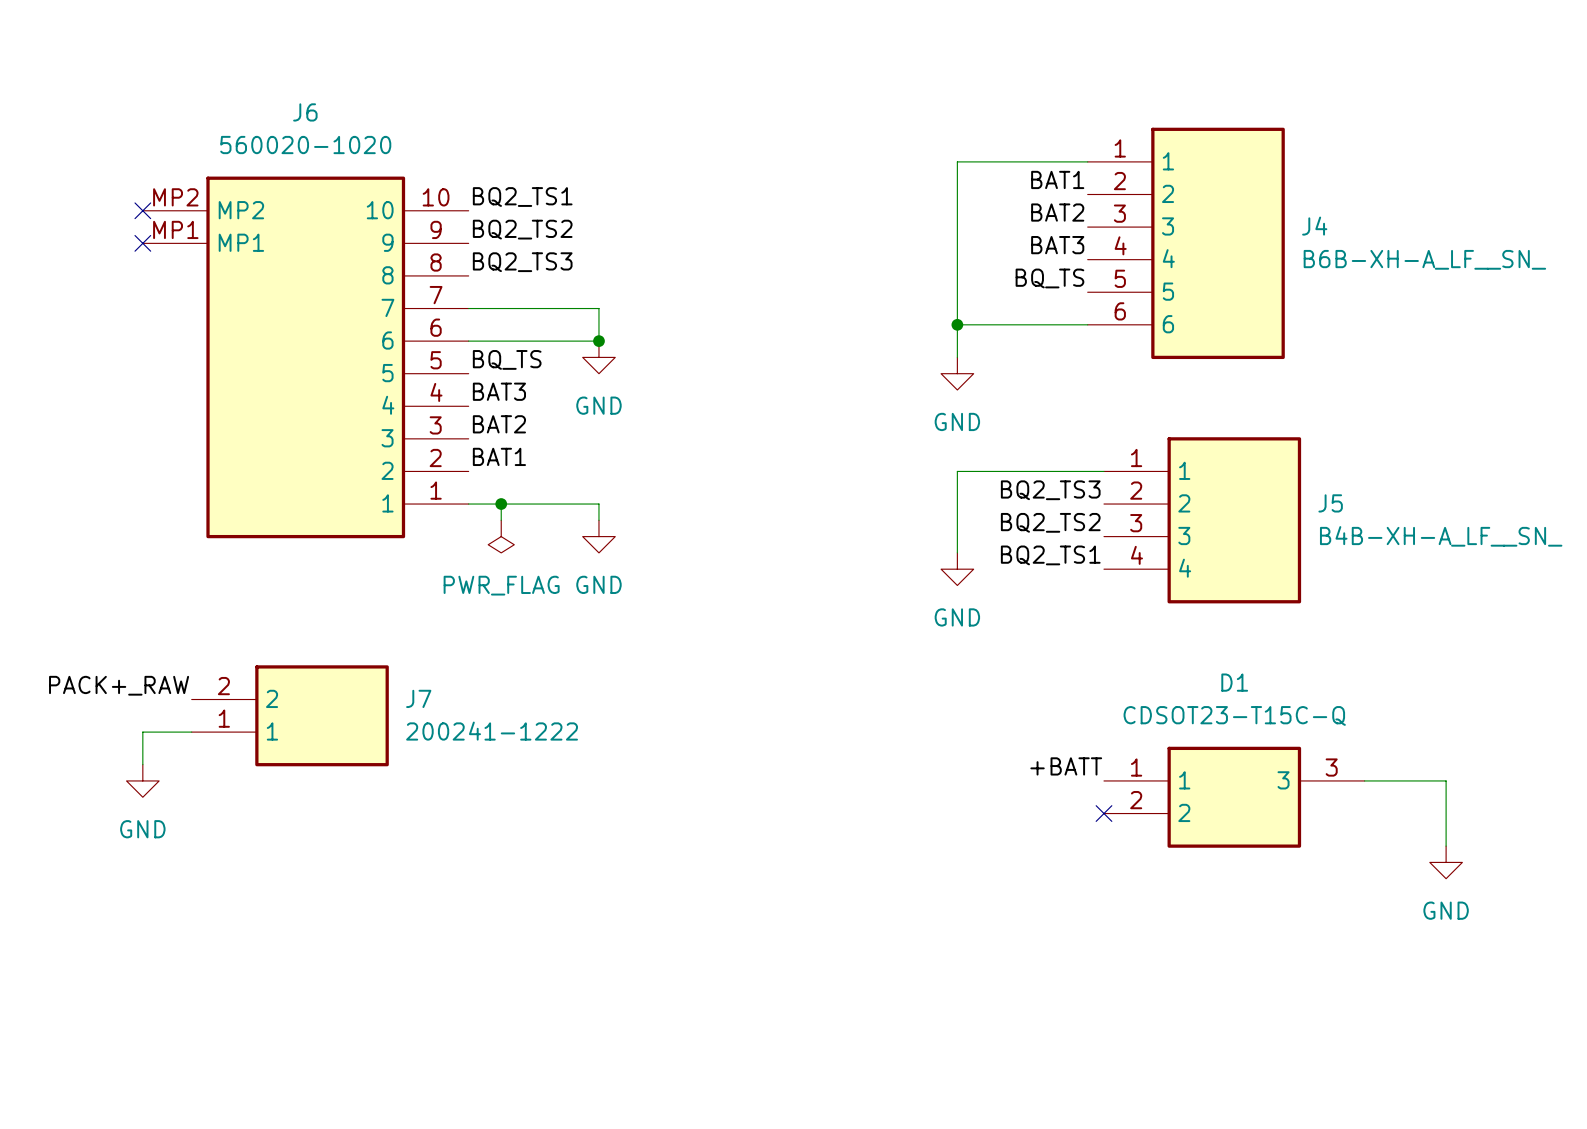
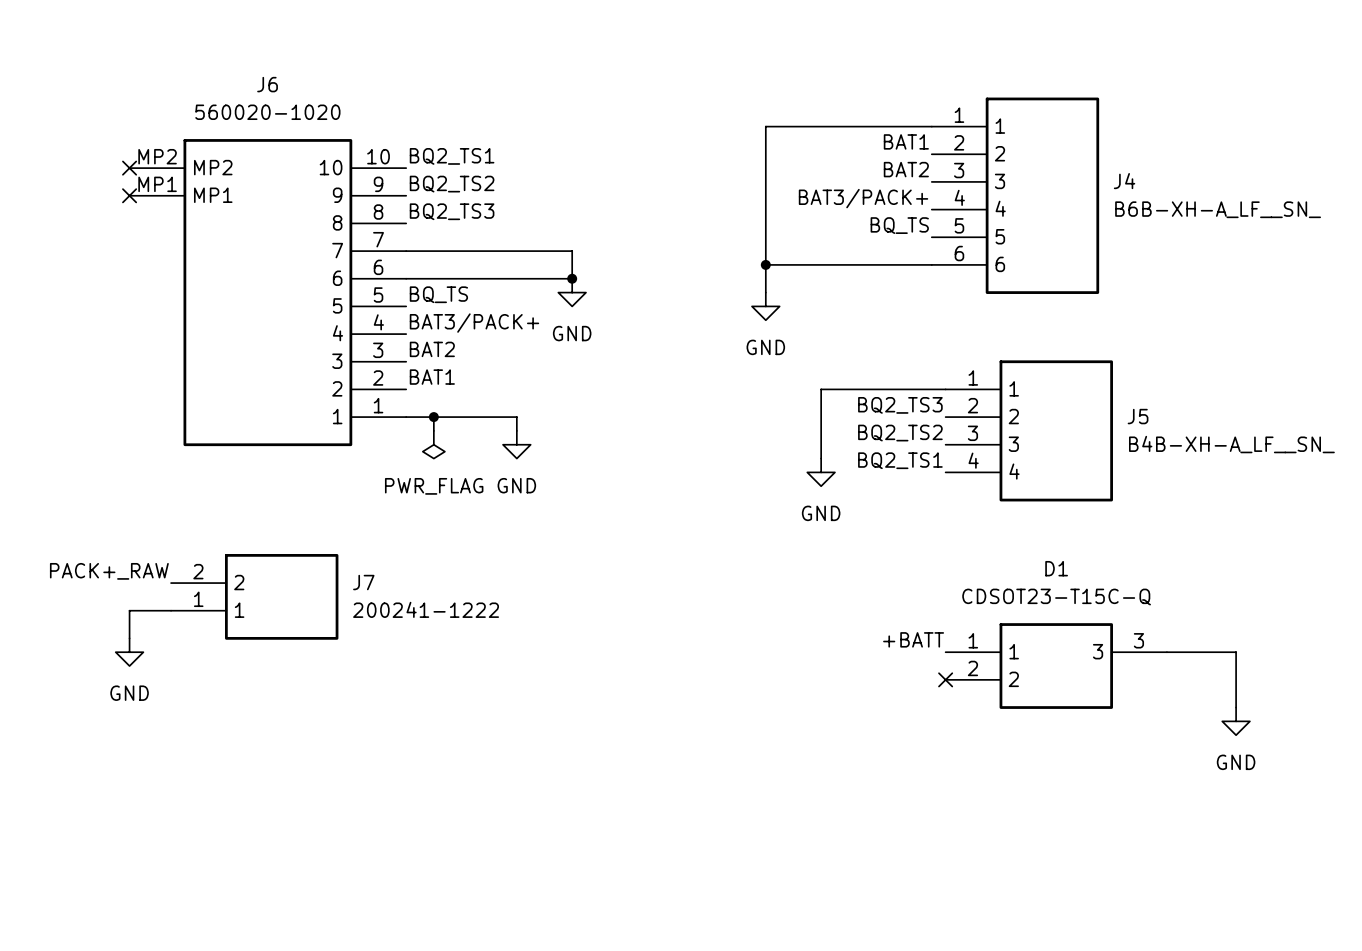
wire: (957, 161) (957, 357) -> (821, 126) (765, 126) (765, 292)
label: BAT3 (1057, 245) -> BAT3/PACK+ (863, 198)
wire: (598, 308) (598, 341) -> (516, 251) (572, 251) (572, 278) (516, 278)
wire: none -> (765, 264) (821, 264)
junction position: (957, 324) -> (765, 264)
junction position: (598, 341) -> (572, 278)
power symbol position: GND (598, 357) -> GND (572, 292)
power symbol position: GND (957, 373) -> GND (765, 306)
label: BAT3 (499, 391) -> BAT3/PACK+ (474, 323)

